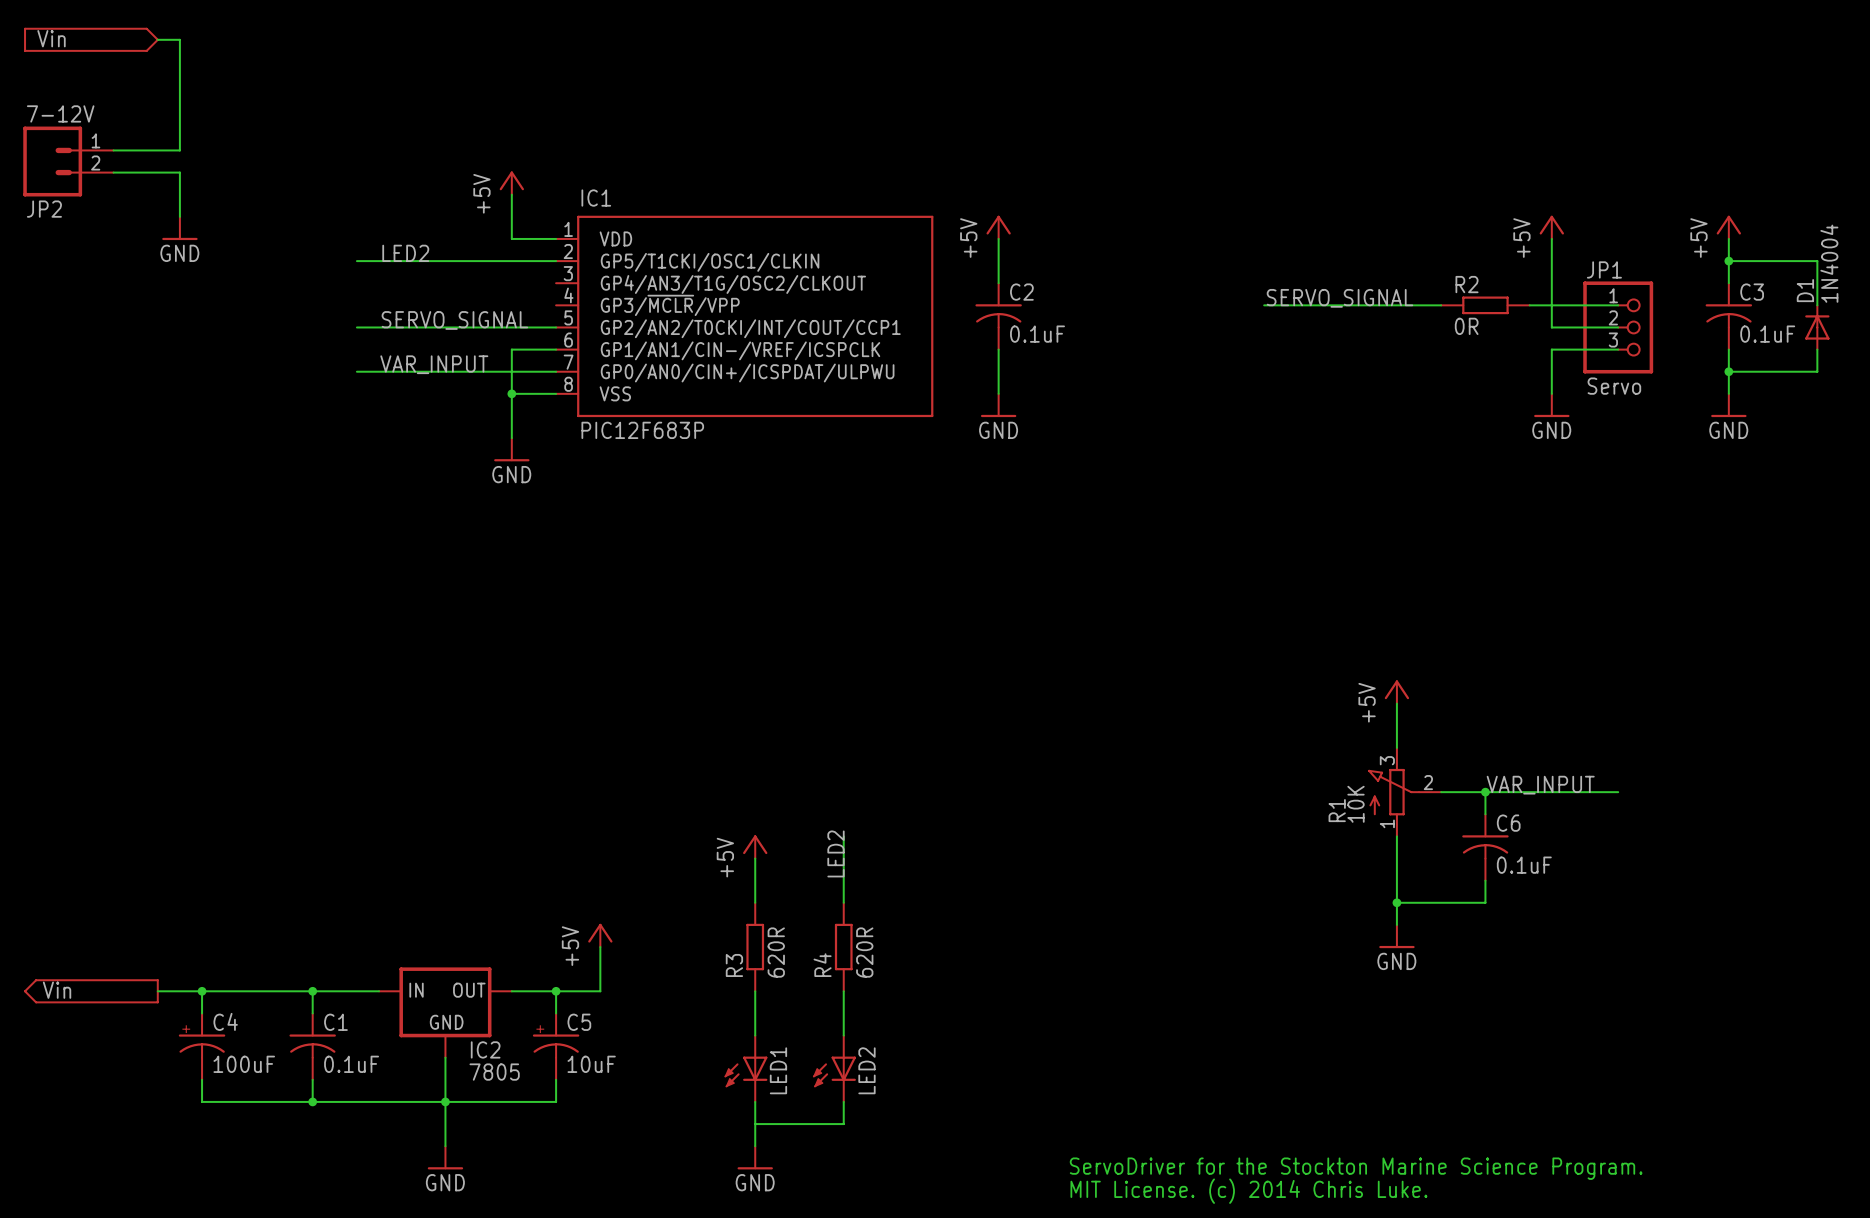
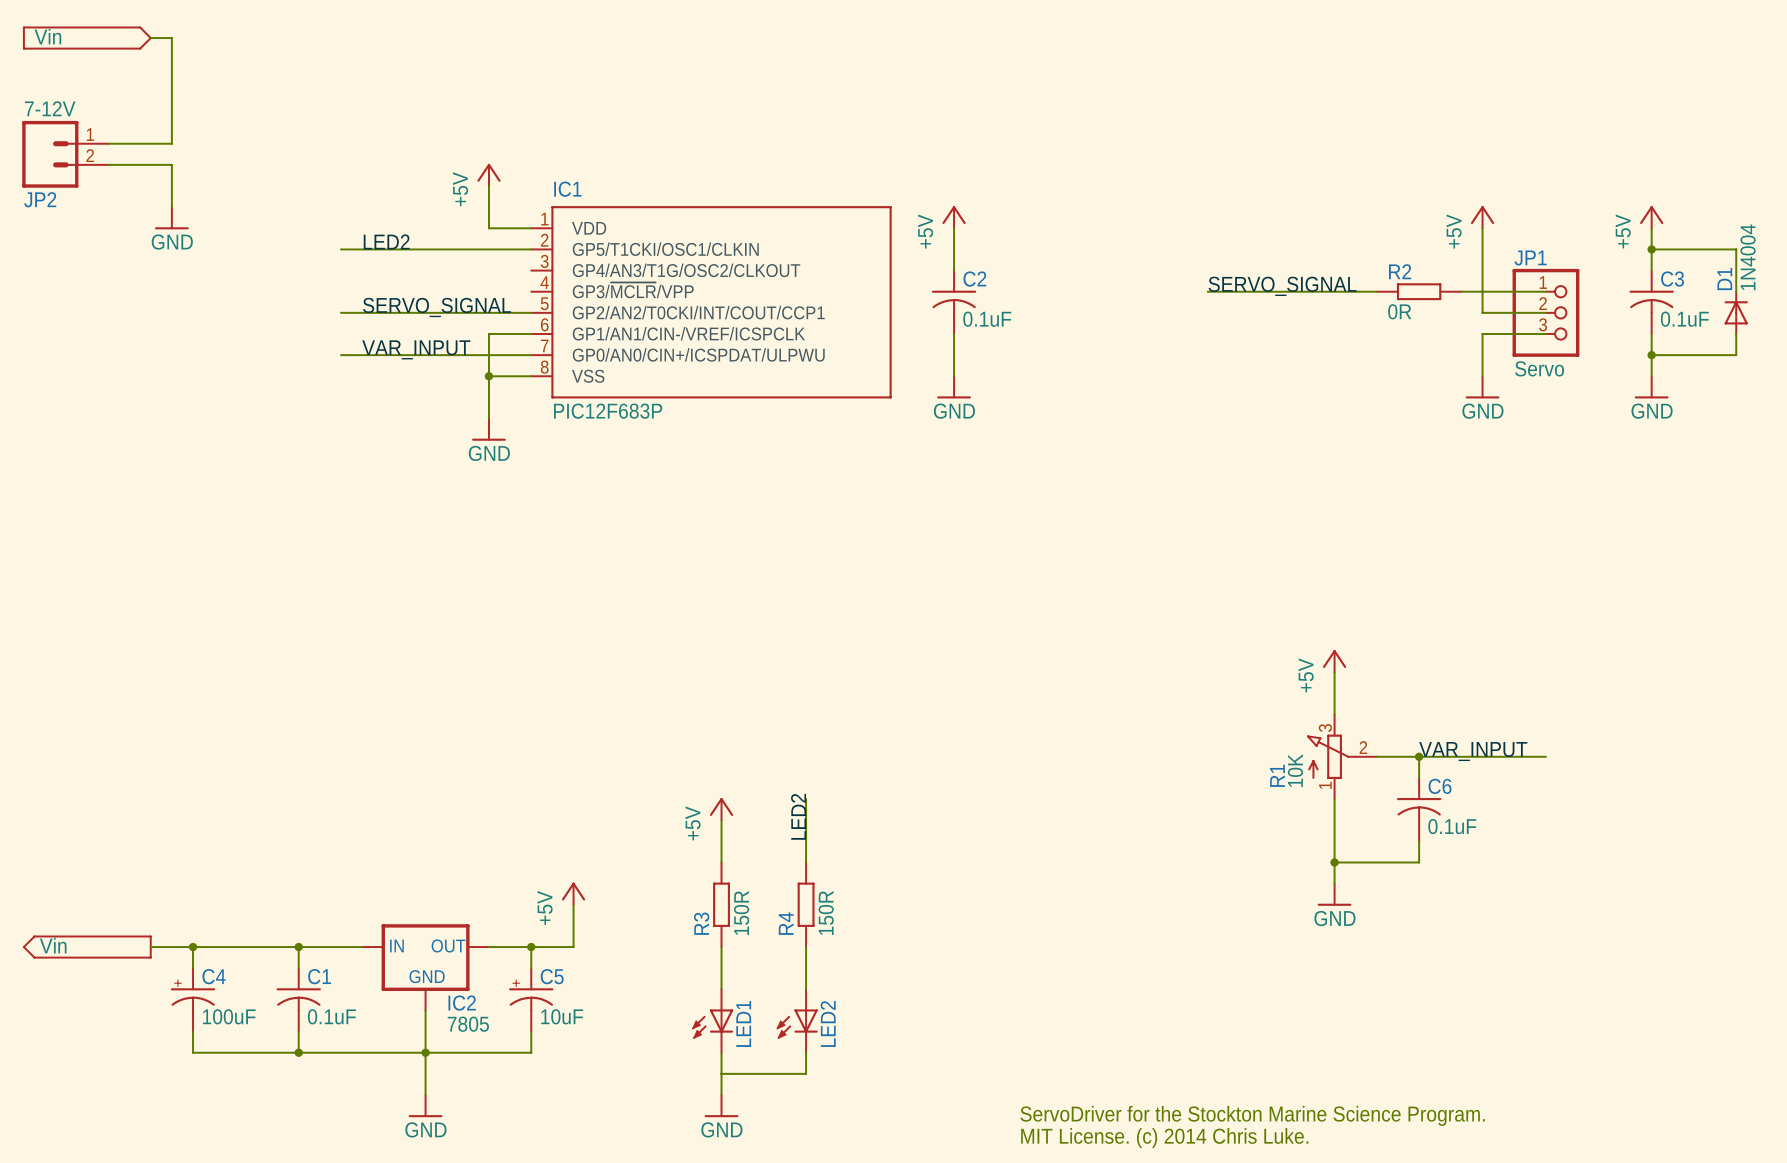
R3 value: 620R (776, 952) -> 150R (741, 913)
R4 value: 620R (864, 952) -> 150R (826, 913)

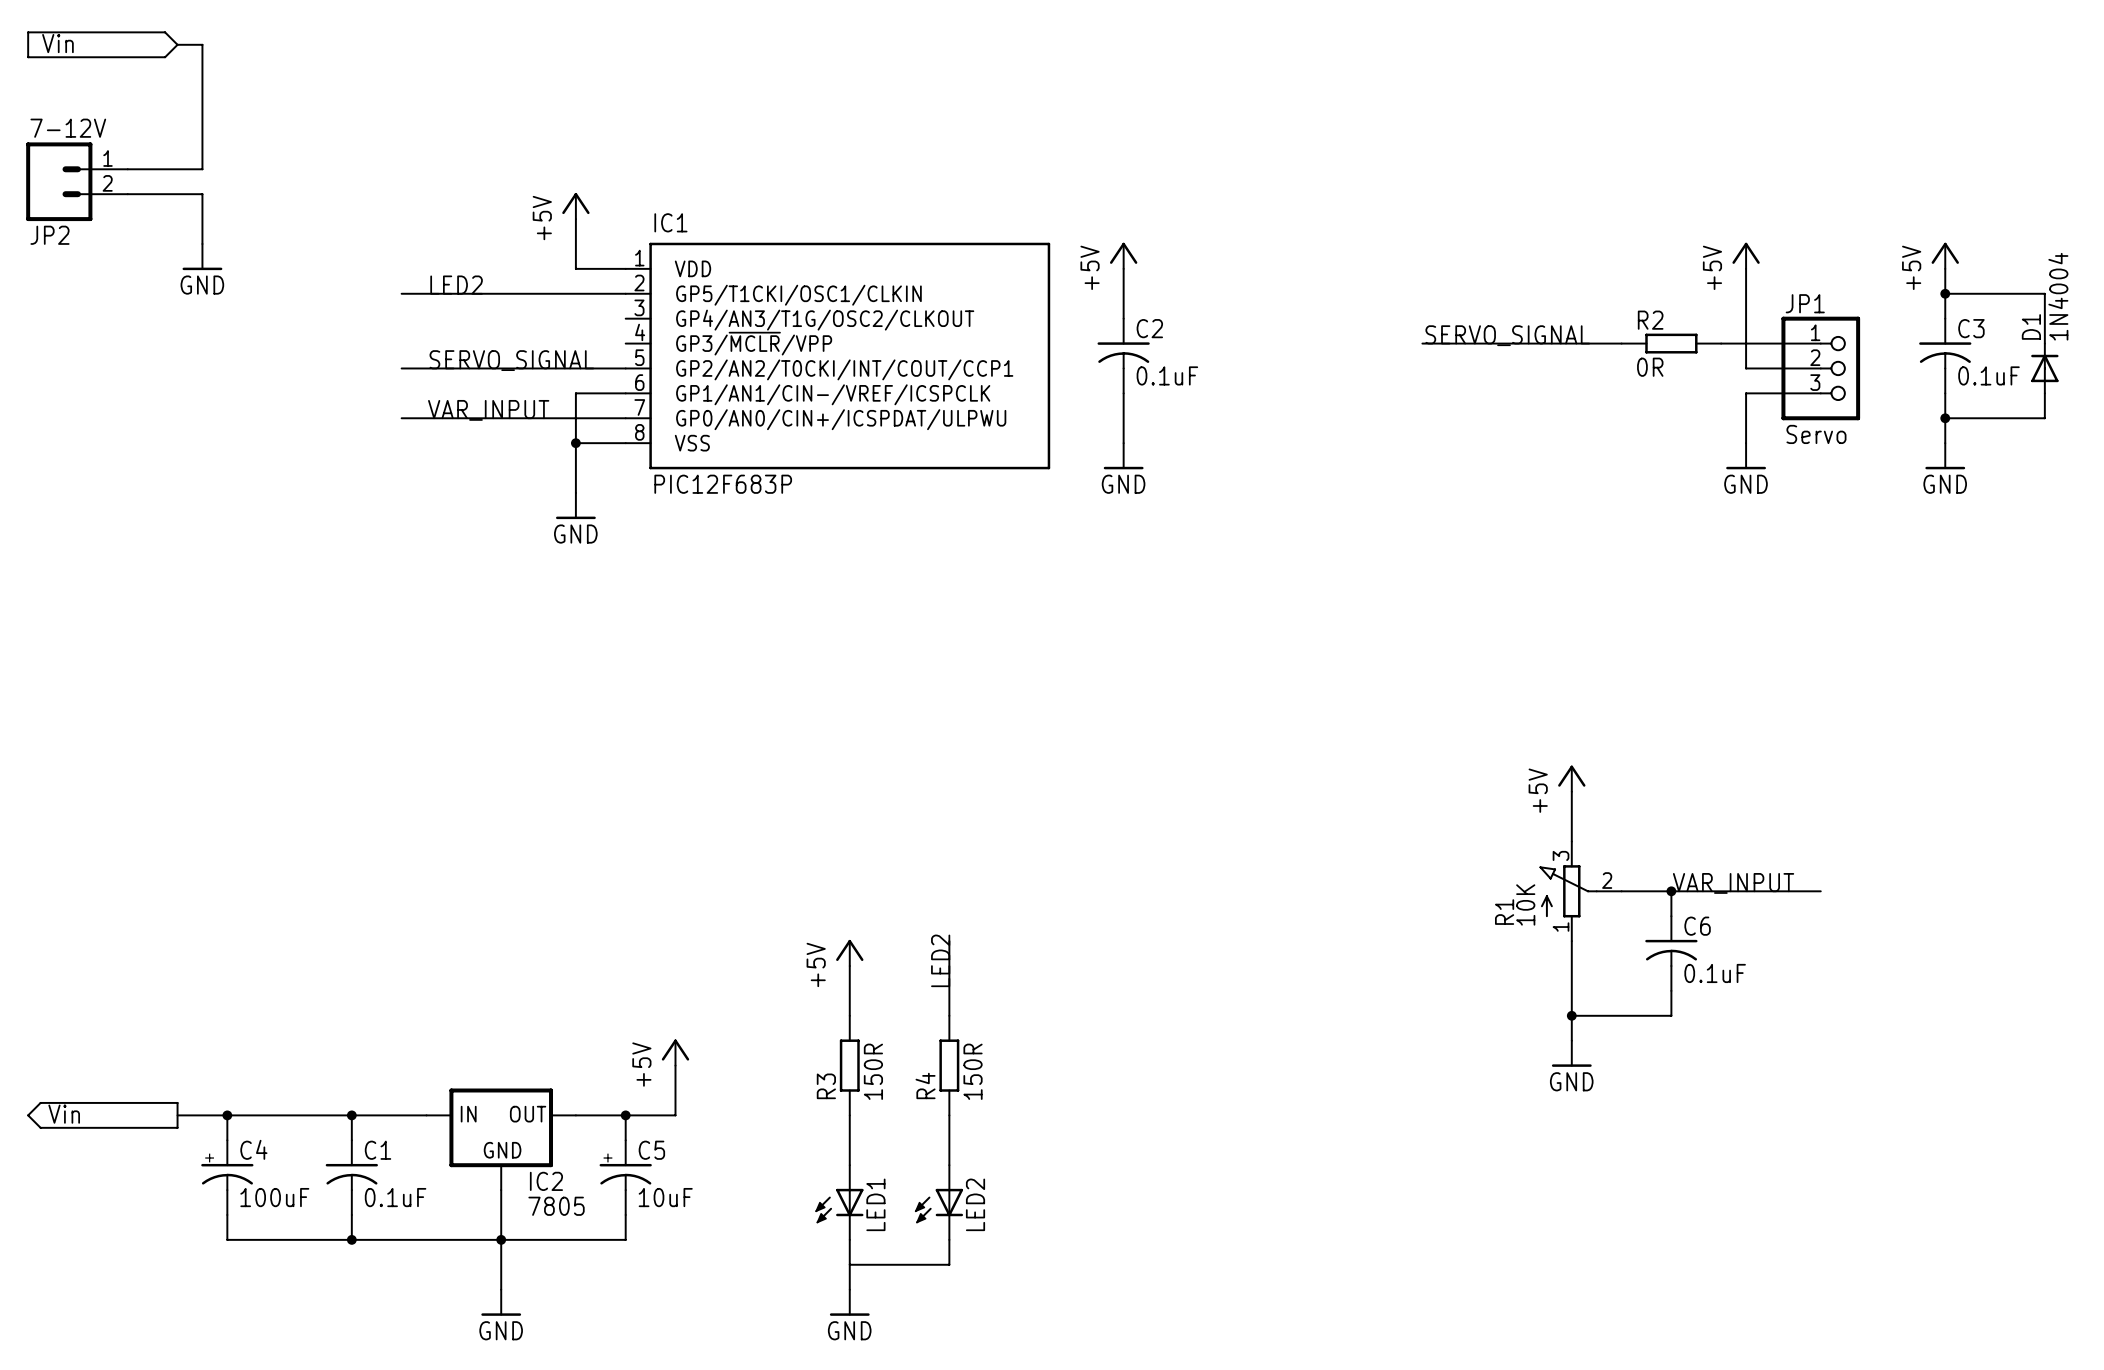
text: ServoDriver for the Stockton Marine Science Program. (1252, 1115) -> none
text: MIT License. (c) 2014 Chris Luke. (1164, 1138) -> none

